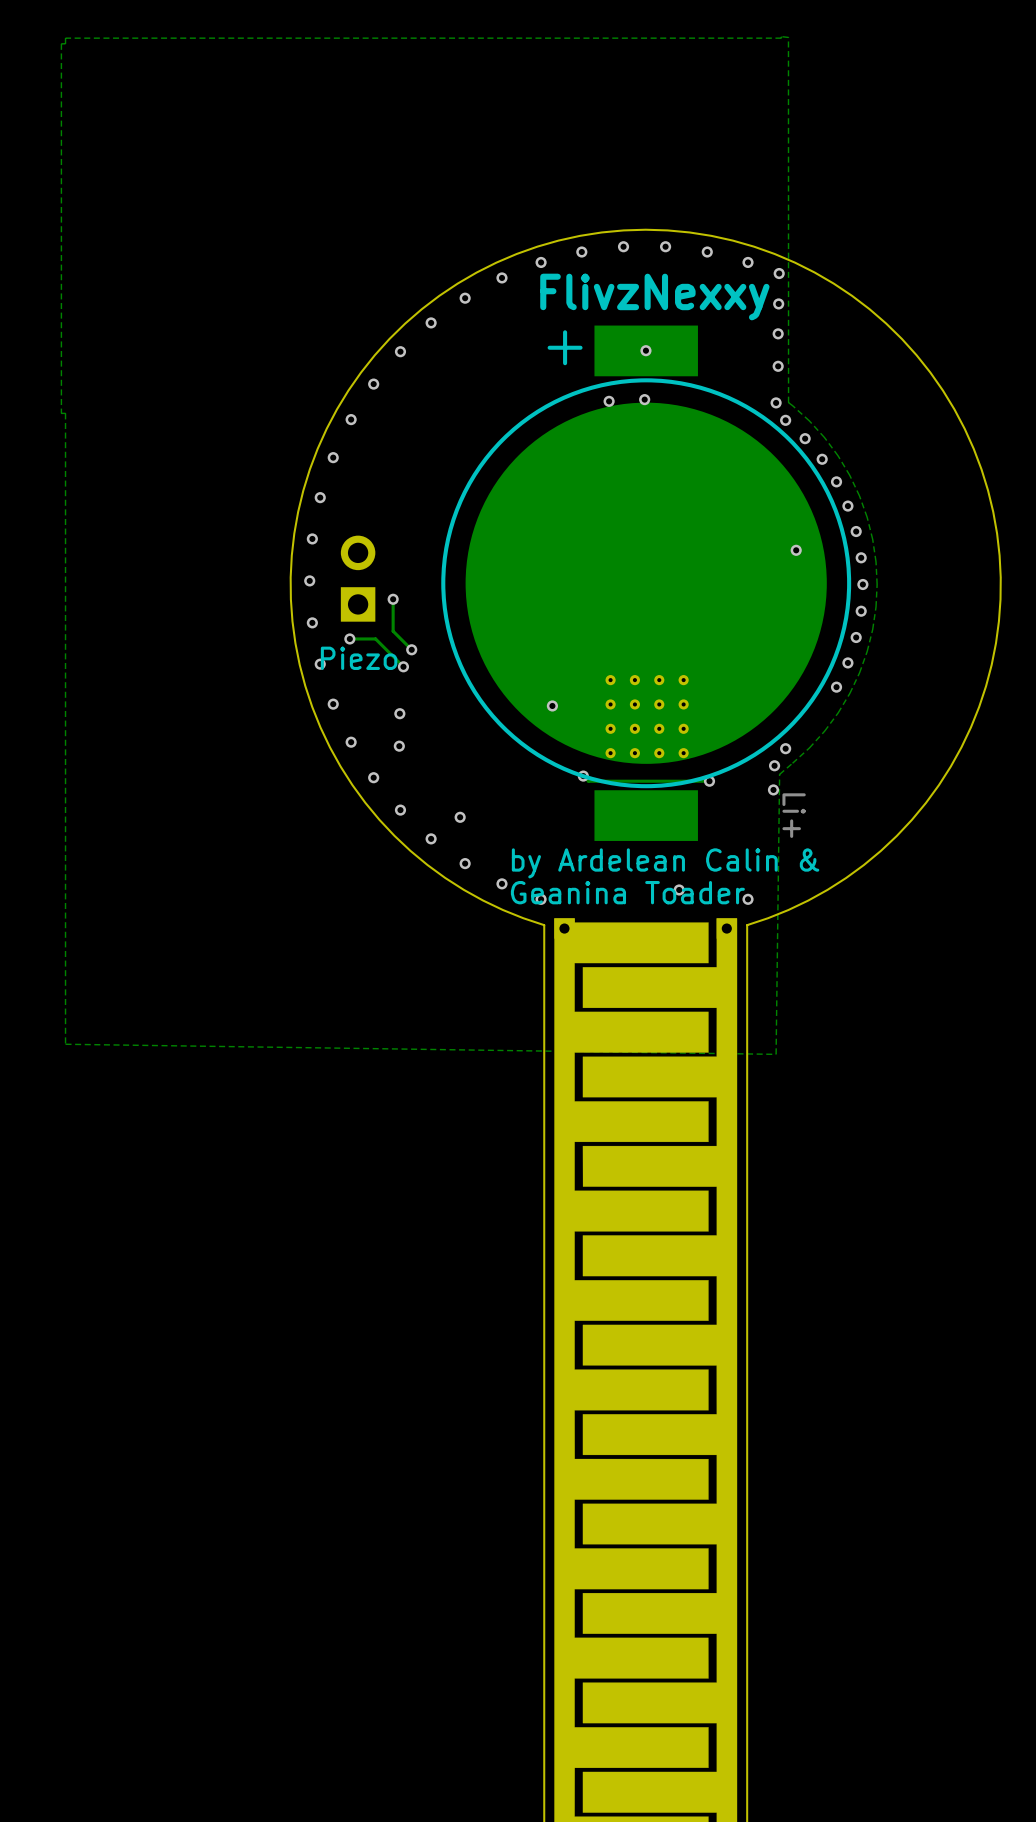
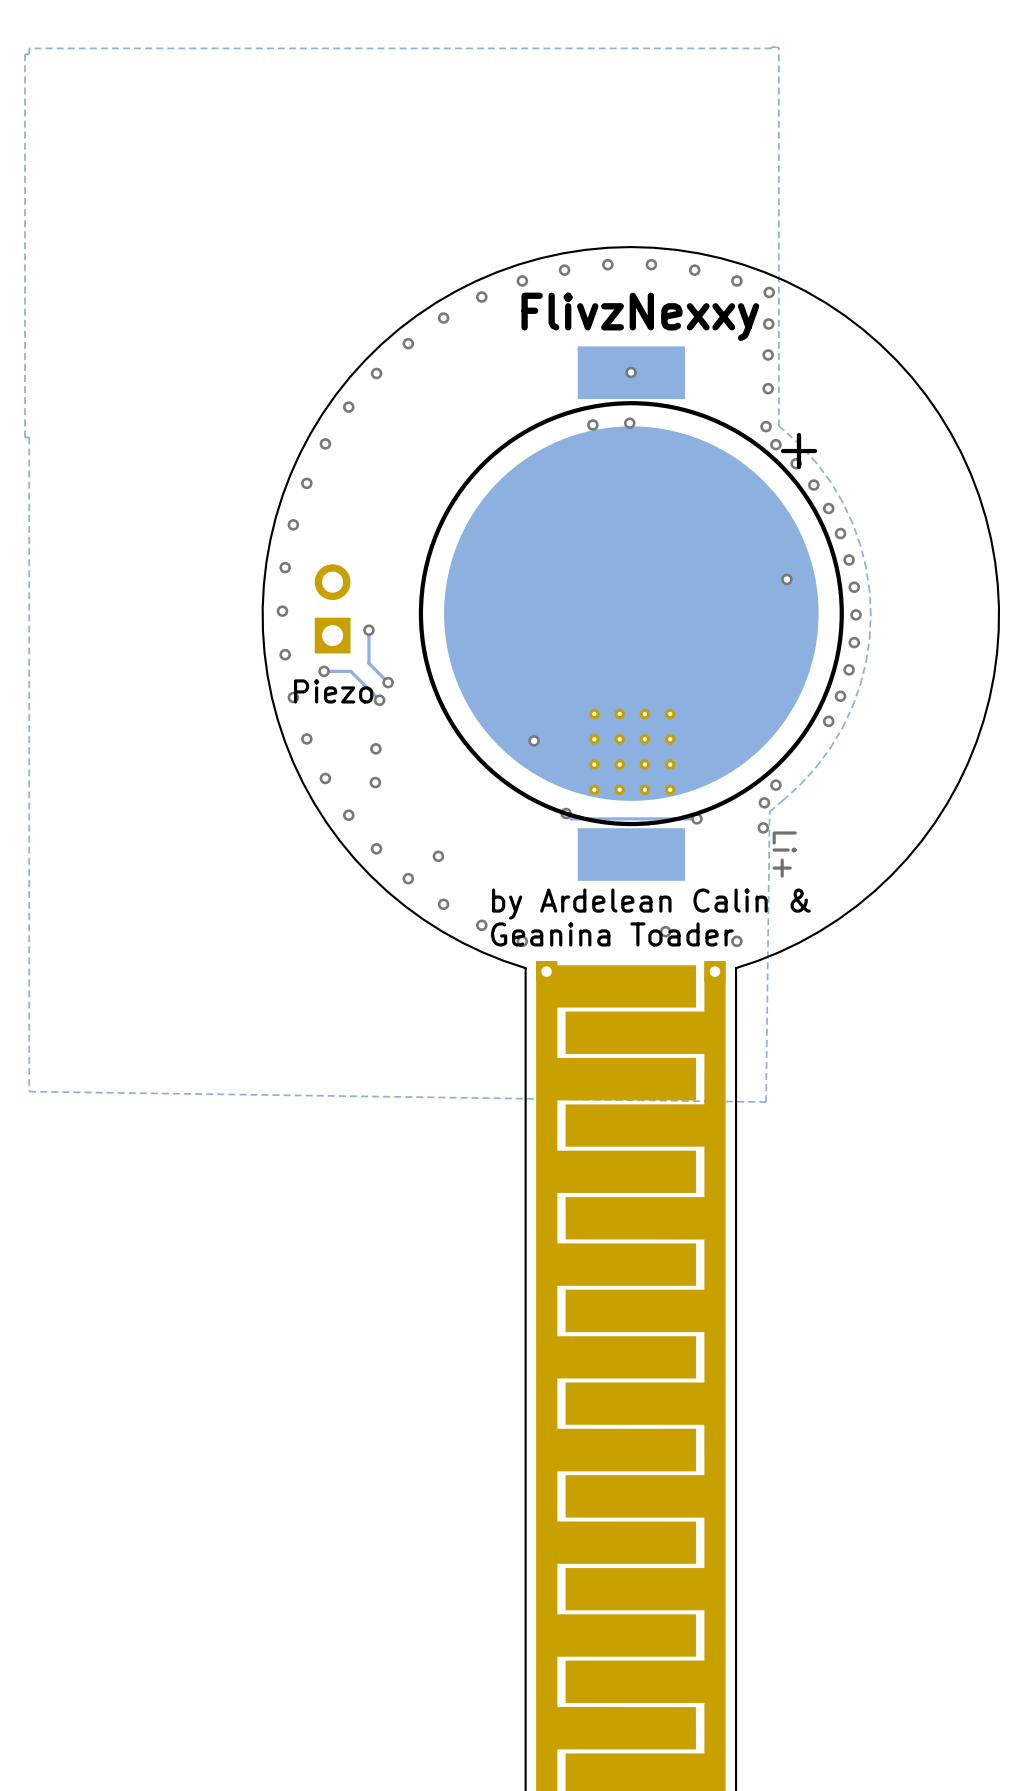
part text position: + (565, 347) -> + (799, 451)

